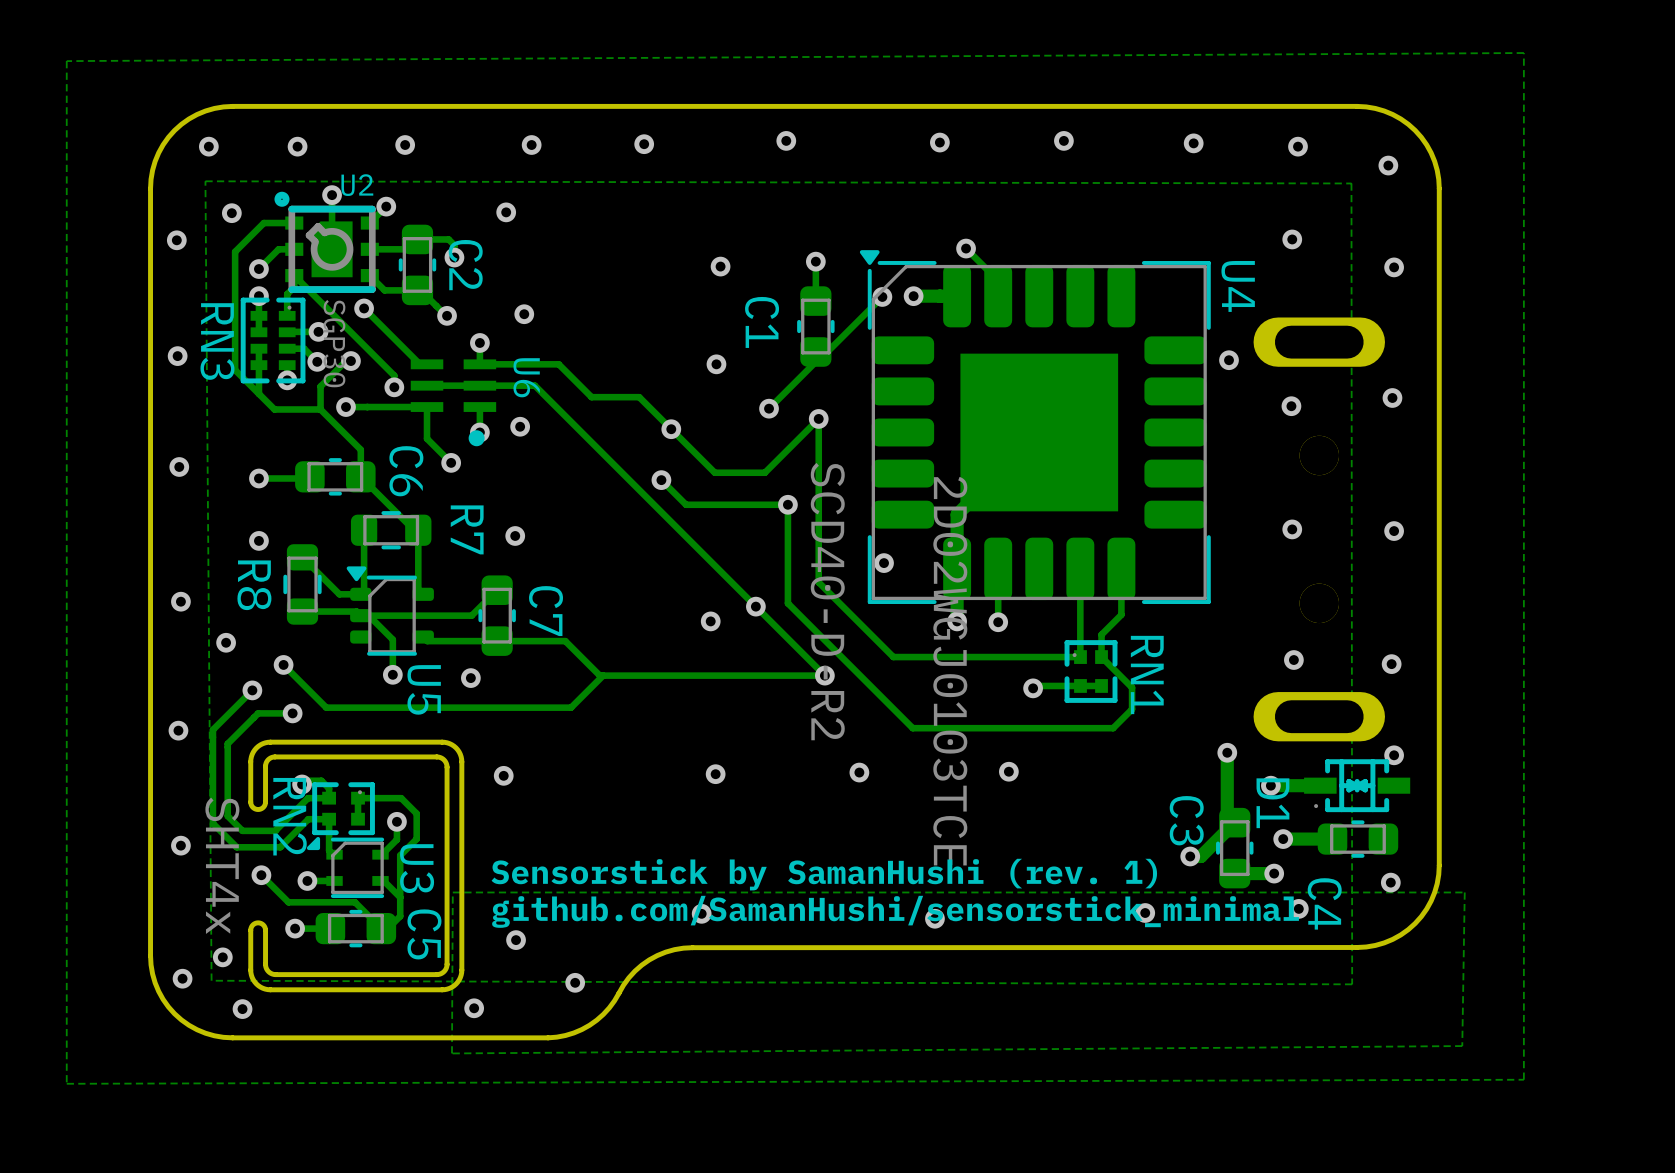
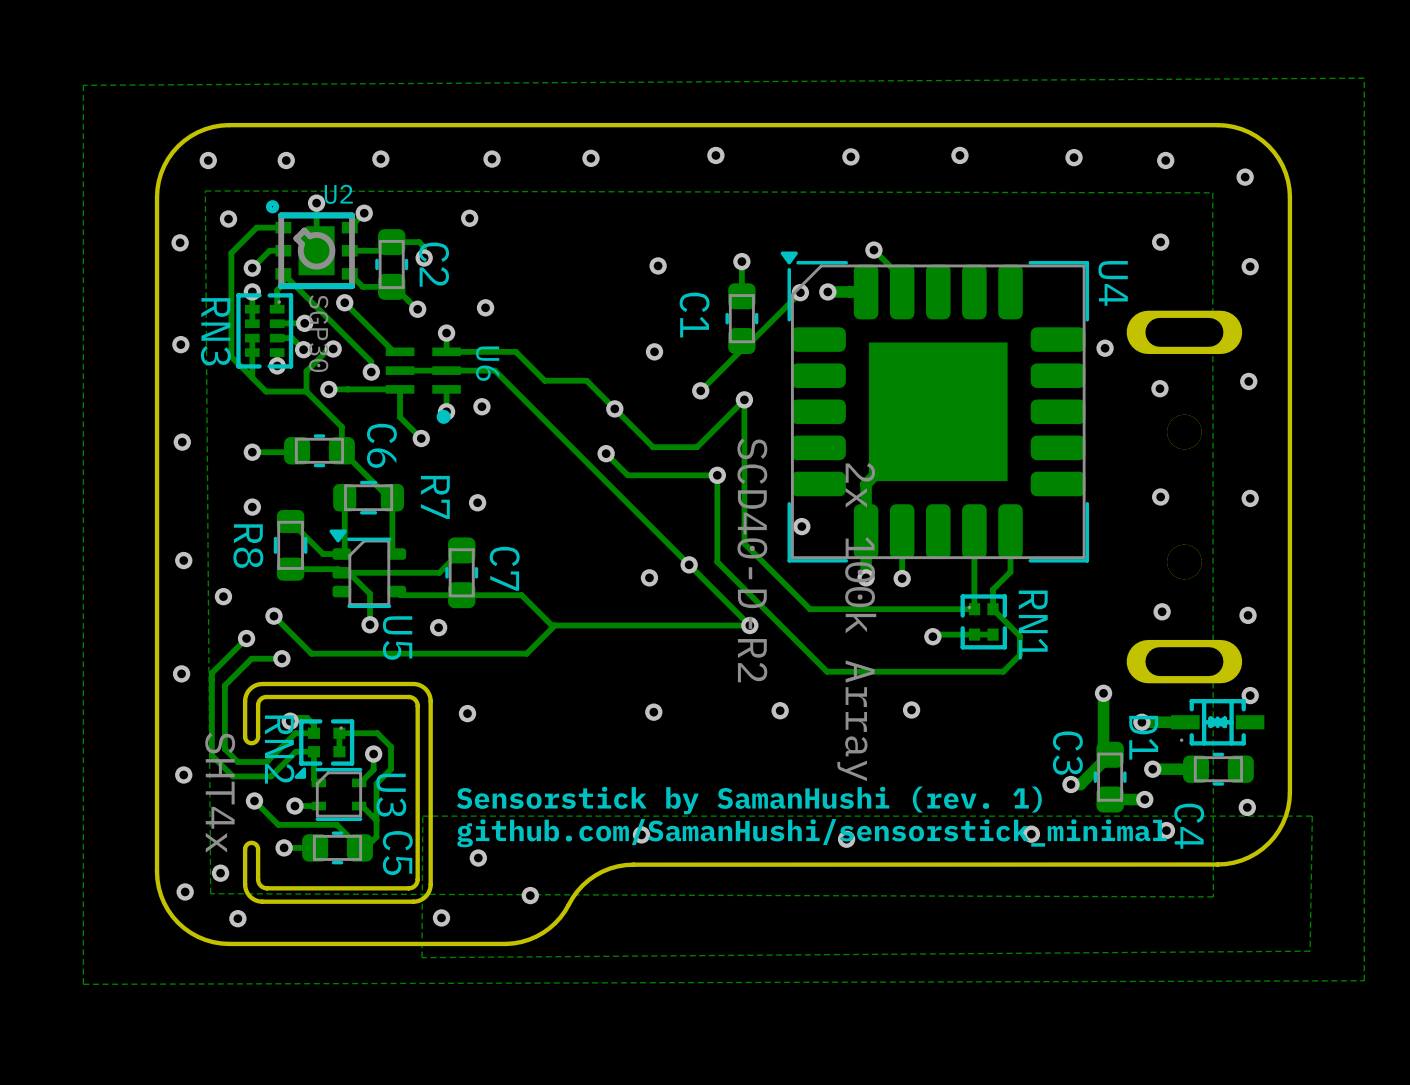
RN1 value: 2D02WGJ0103TCE (950, 671) -> 2x 100k Array (856, 622)

